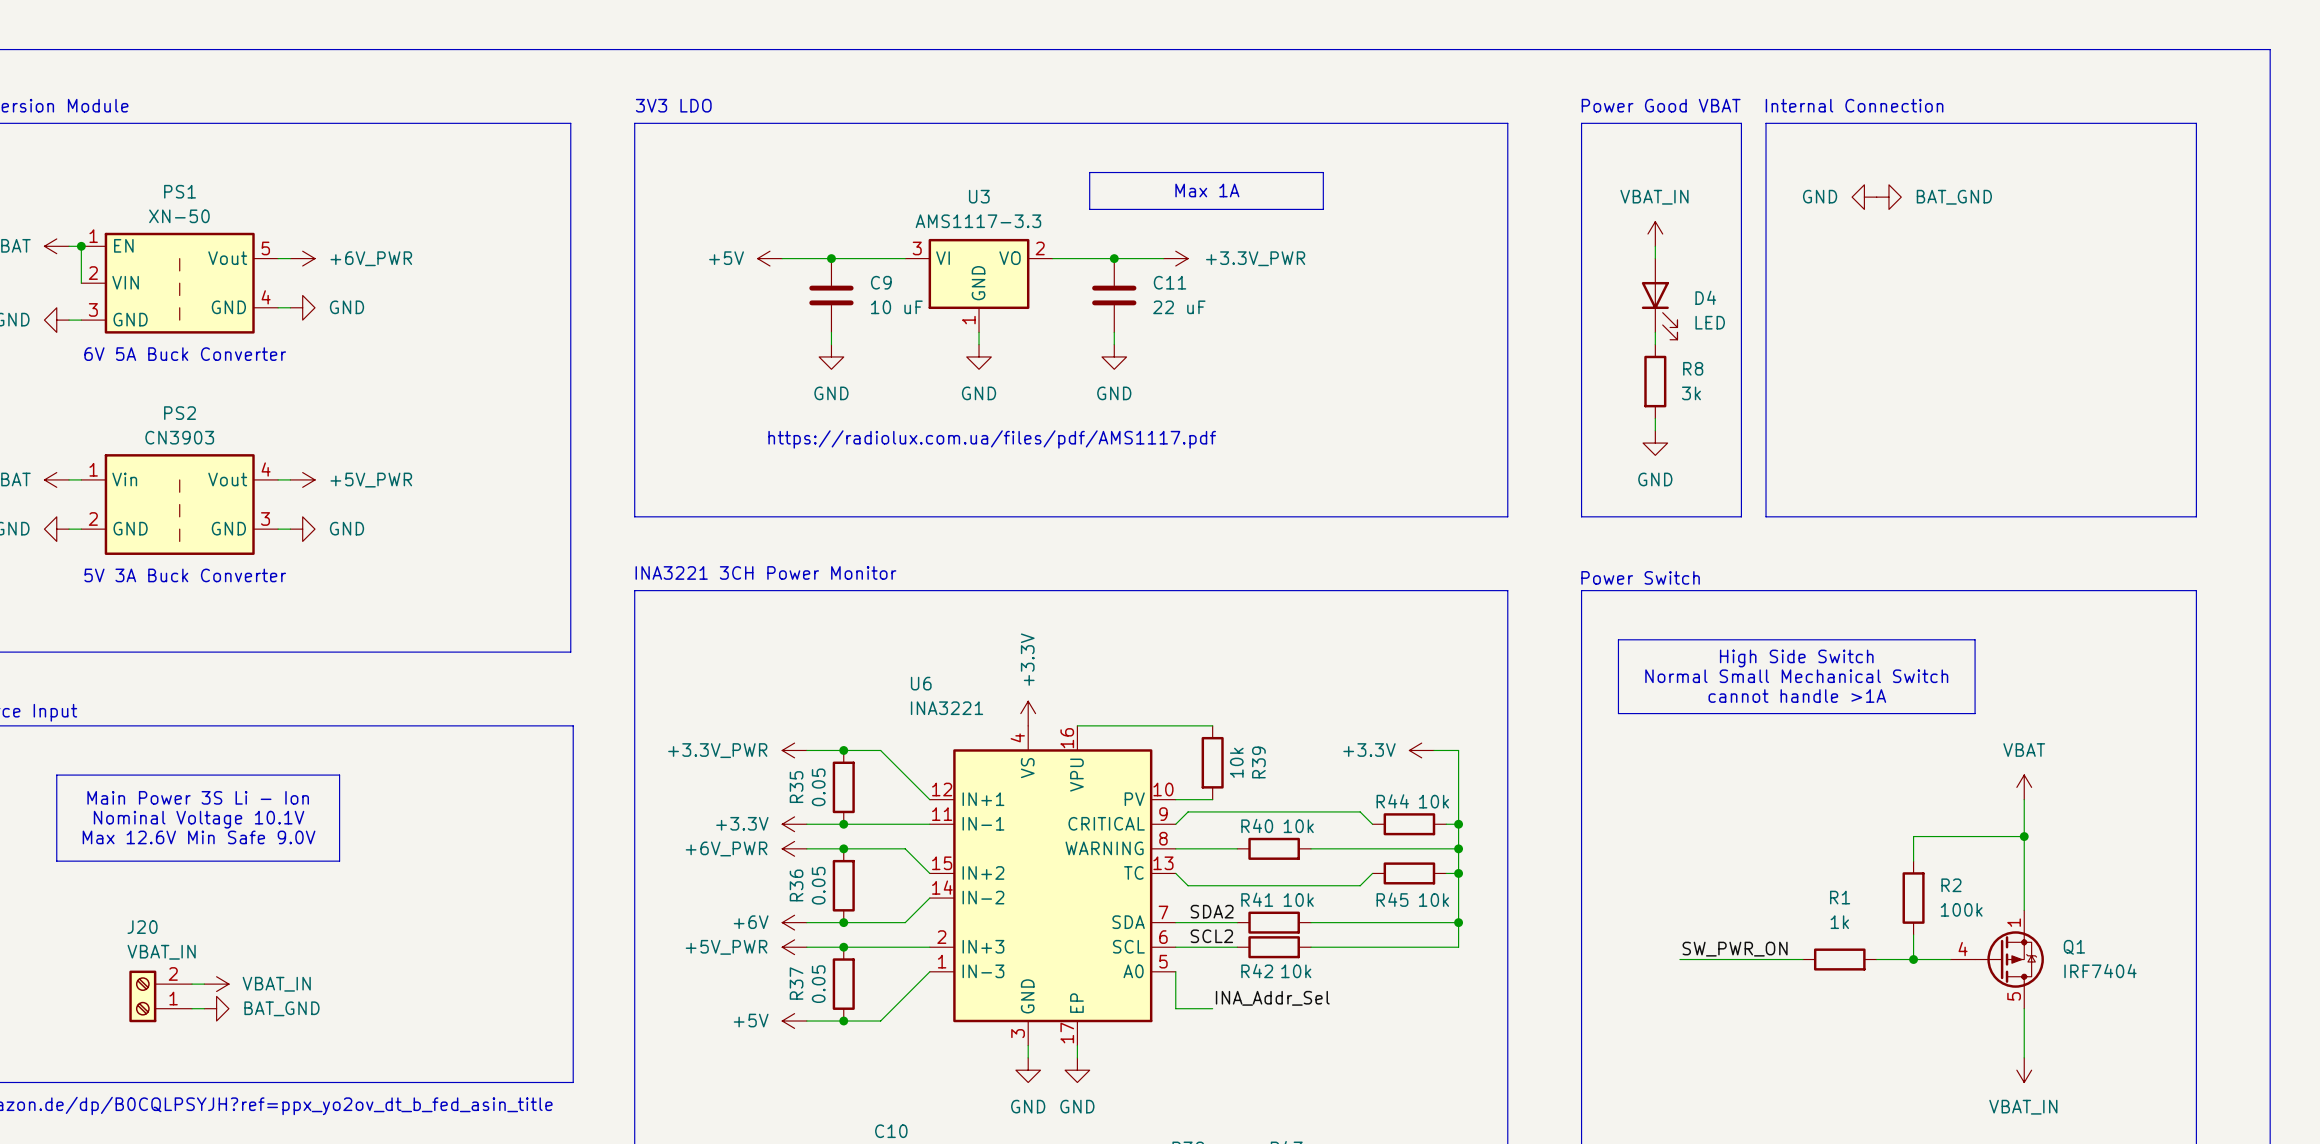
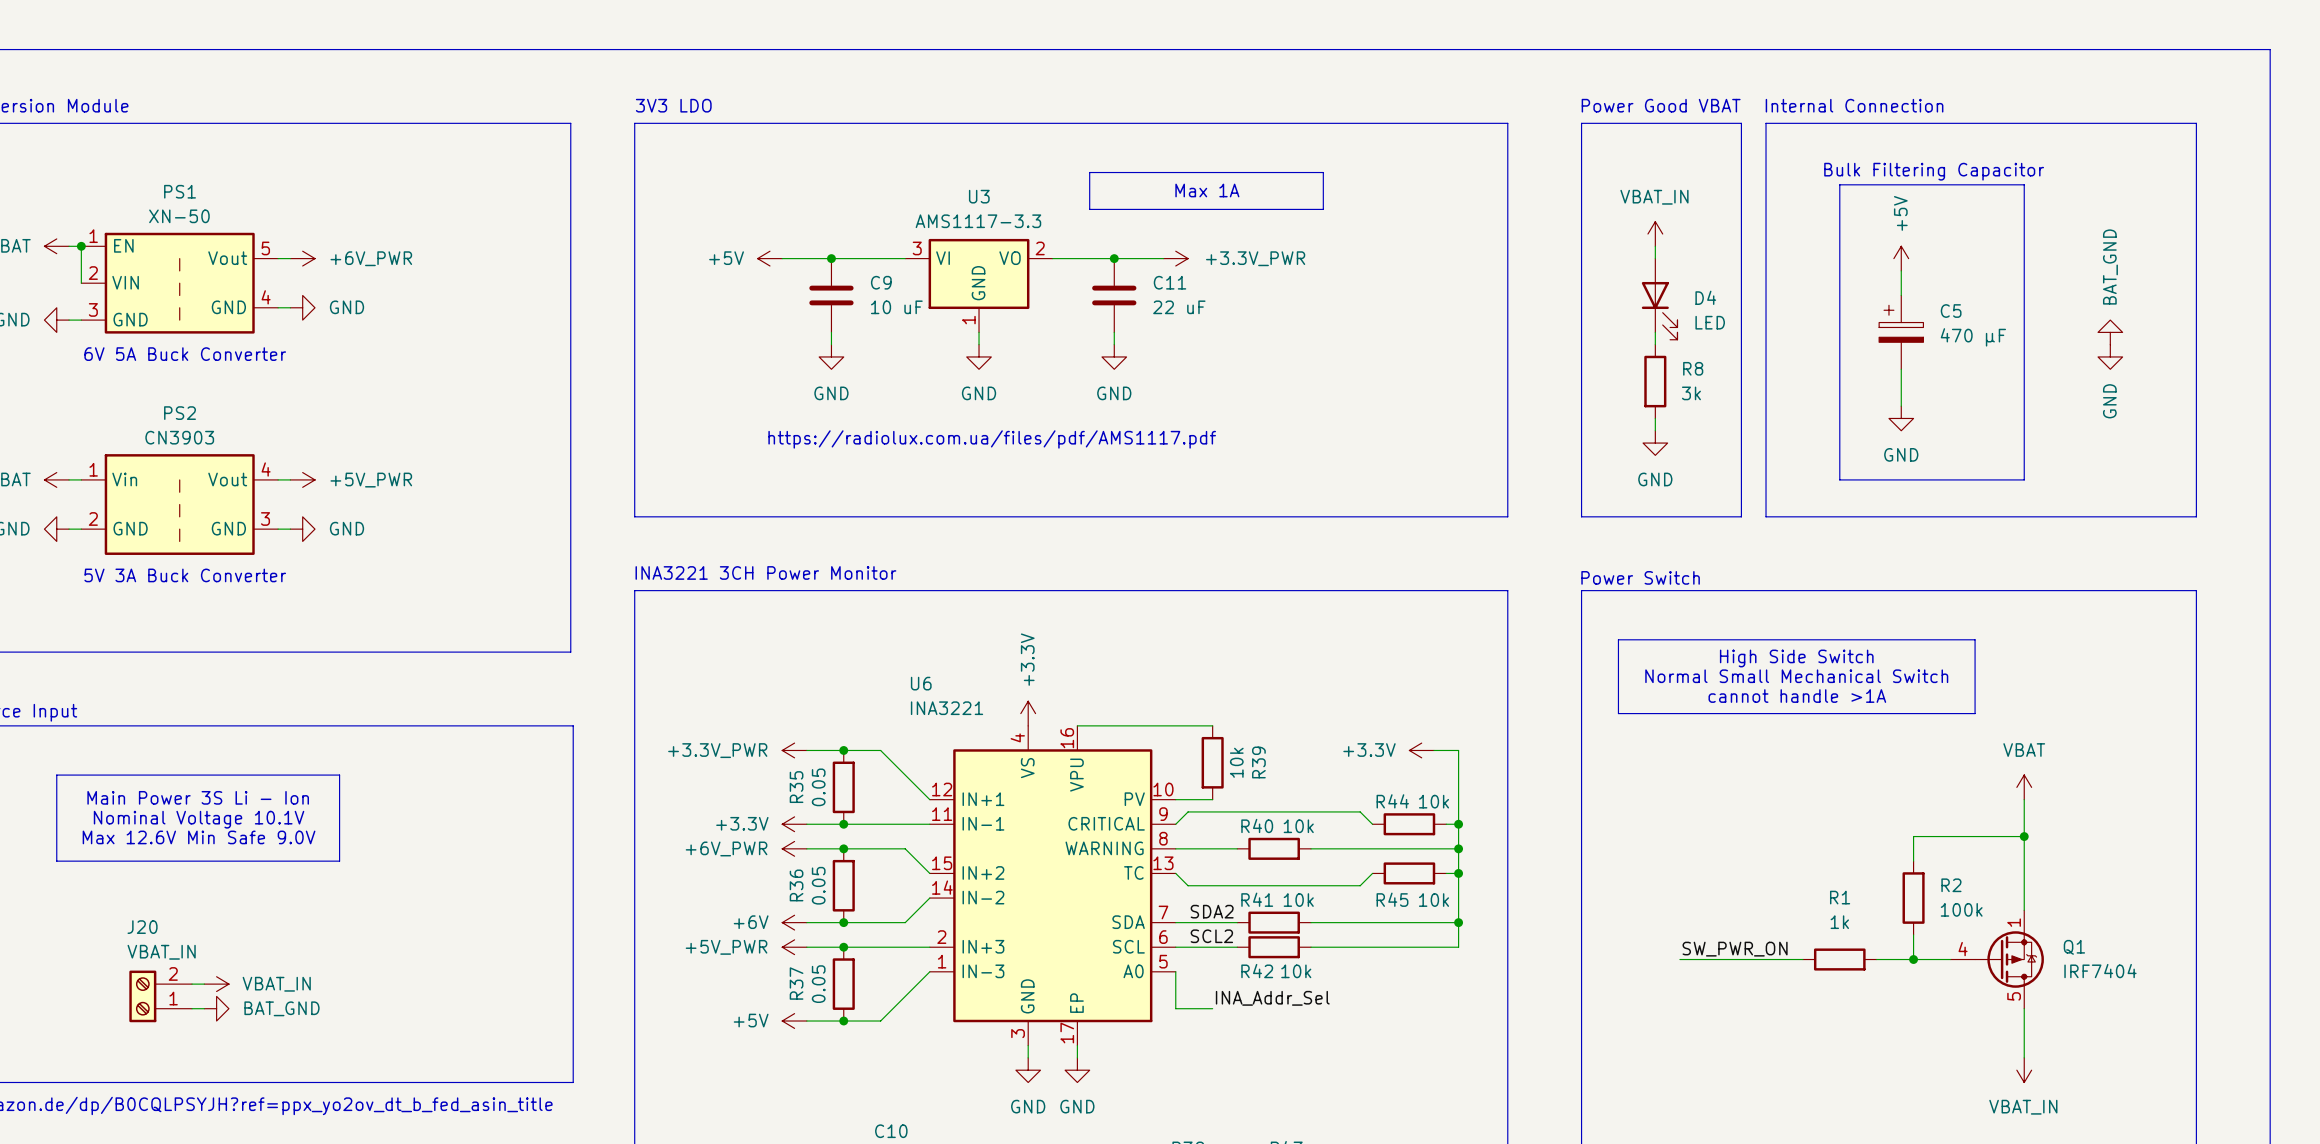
text: none -> Bulk Filtering Capacitor (1934, 171)
line: none -> (1839, 184) (2024, 184) (2024, 479) (1839, 479) (1839, 184)
power symbol: GND (1864, 197) -> none
power symbol: BAT_GND (1888, 197) -> none
power symbol: none -> +5V (1901, 258)
wire: none -> (1901, 270) (1901, 295)
C5: none -> 470 µF (1901, 332)
power symbol: none -> BAT_GND (2110, 332)
power symbol: none -> GND (2110, 356)
wire: none -> (1901, 369) (1901, 406)
power symbol: none -> GND (1901, 418)

